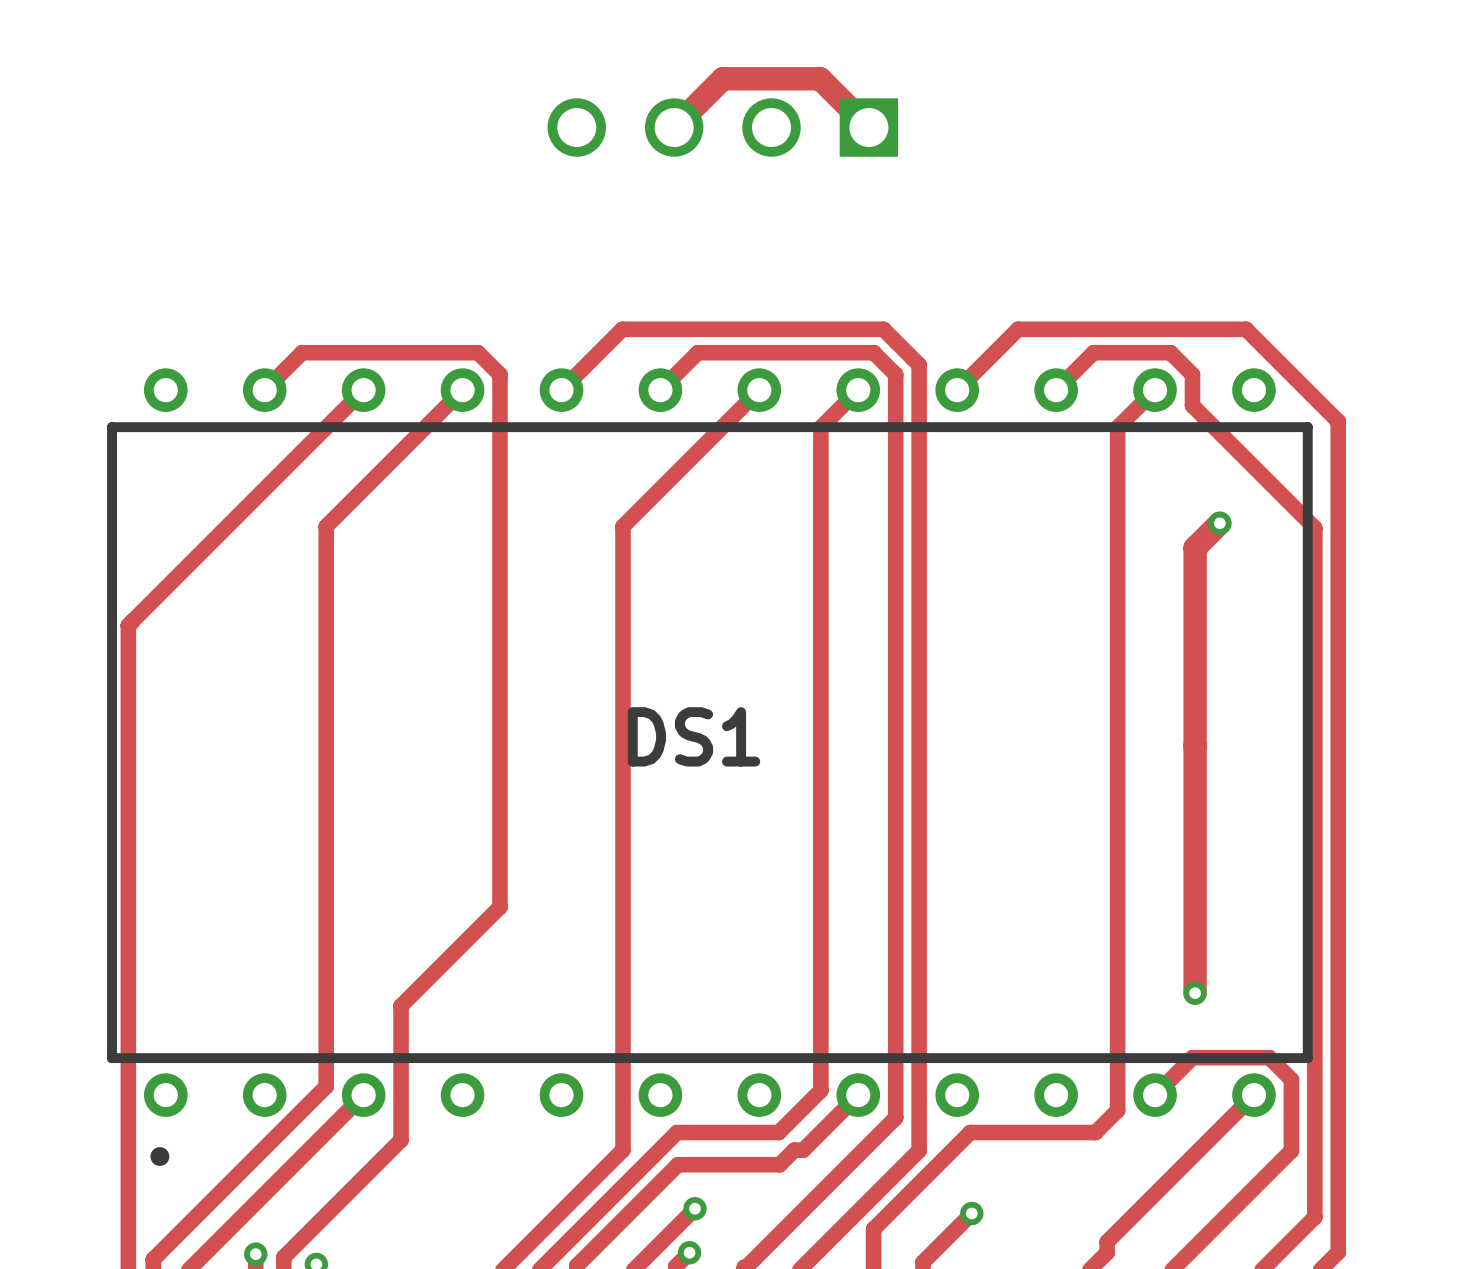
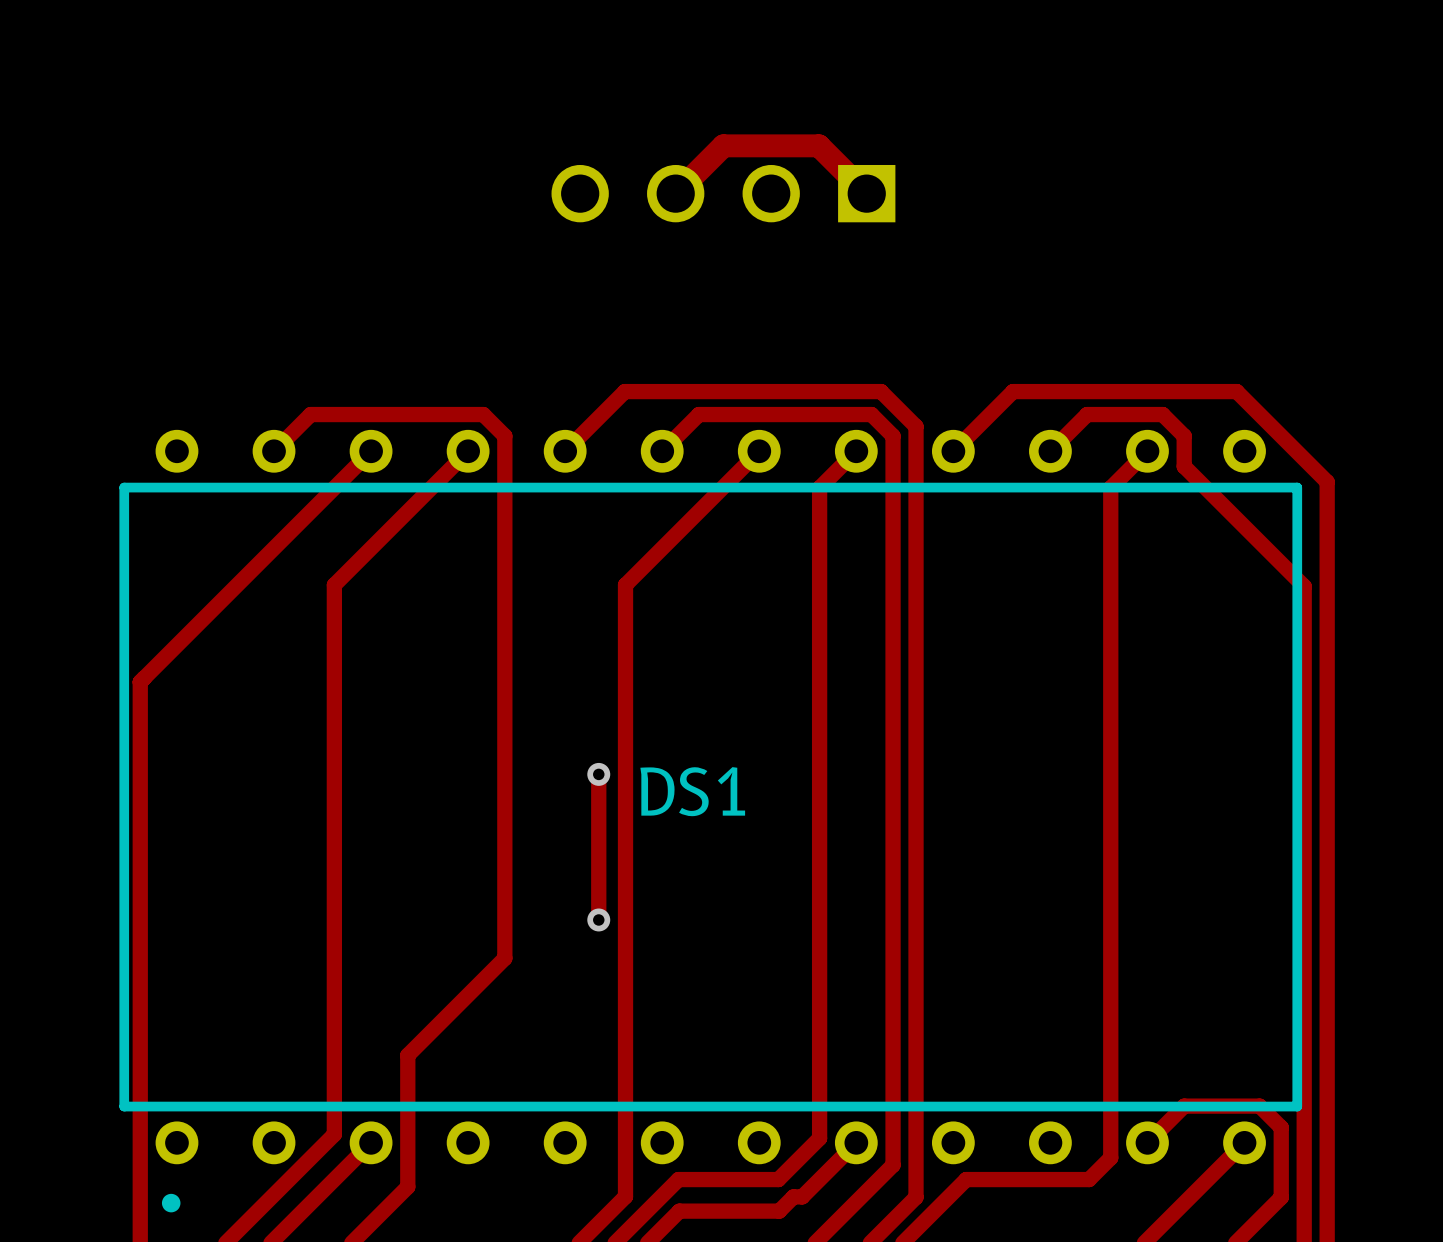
track: (1219, 523) (1195, 547) (1195, 993) -> none
via: (1219, 523) -> none
track: none -> (598, 774) (598, 919)
via: none -> (598, 774)
via: none -> (598, 919)
via: (1195, 993) -> none

